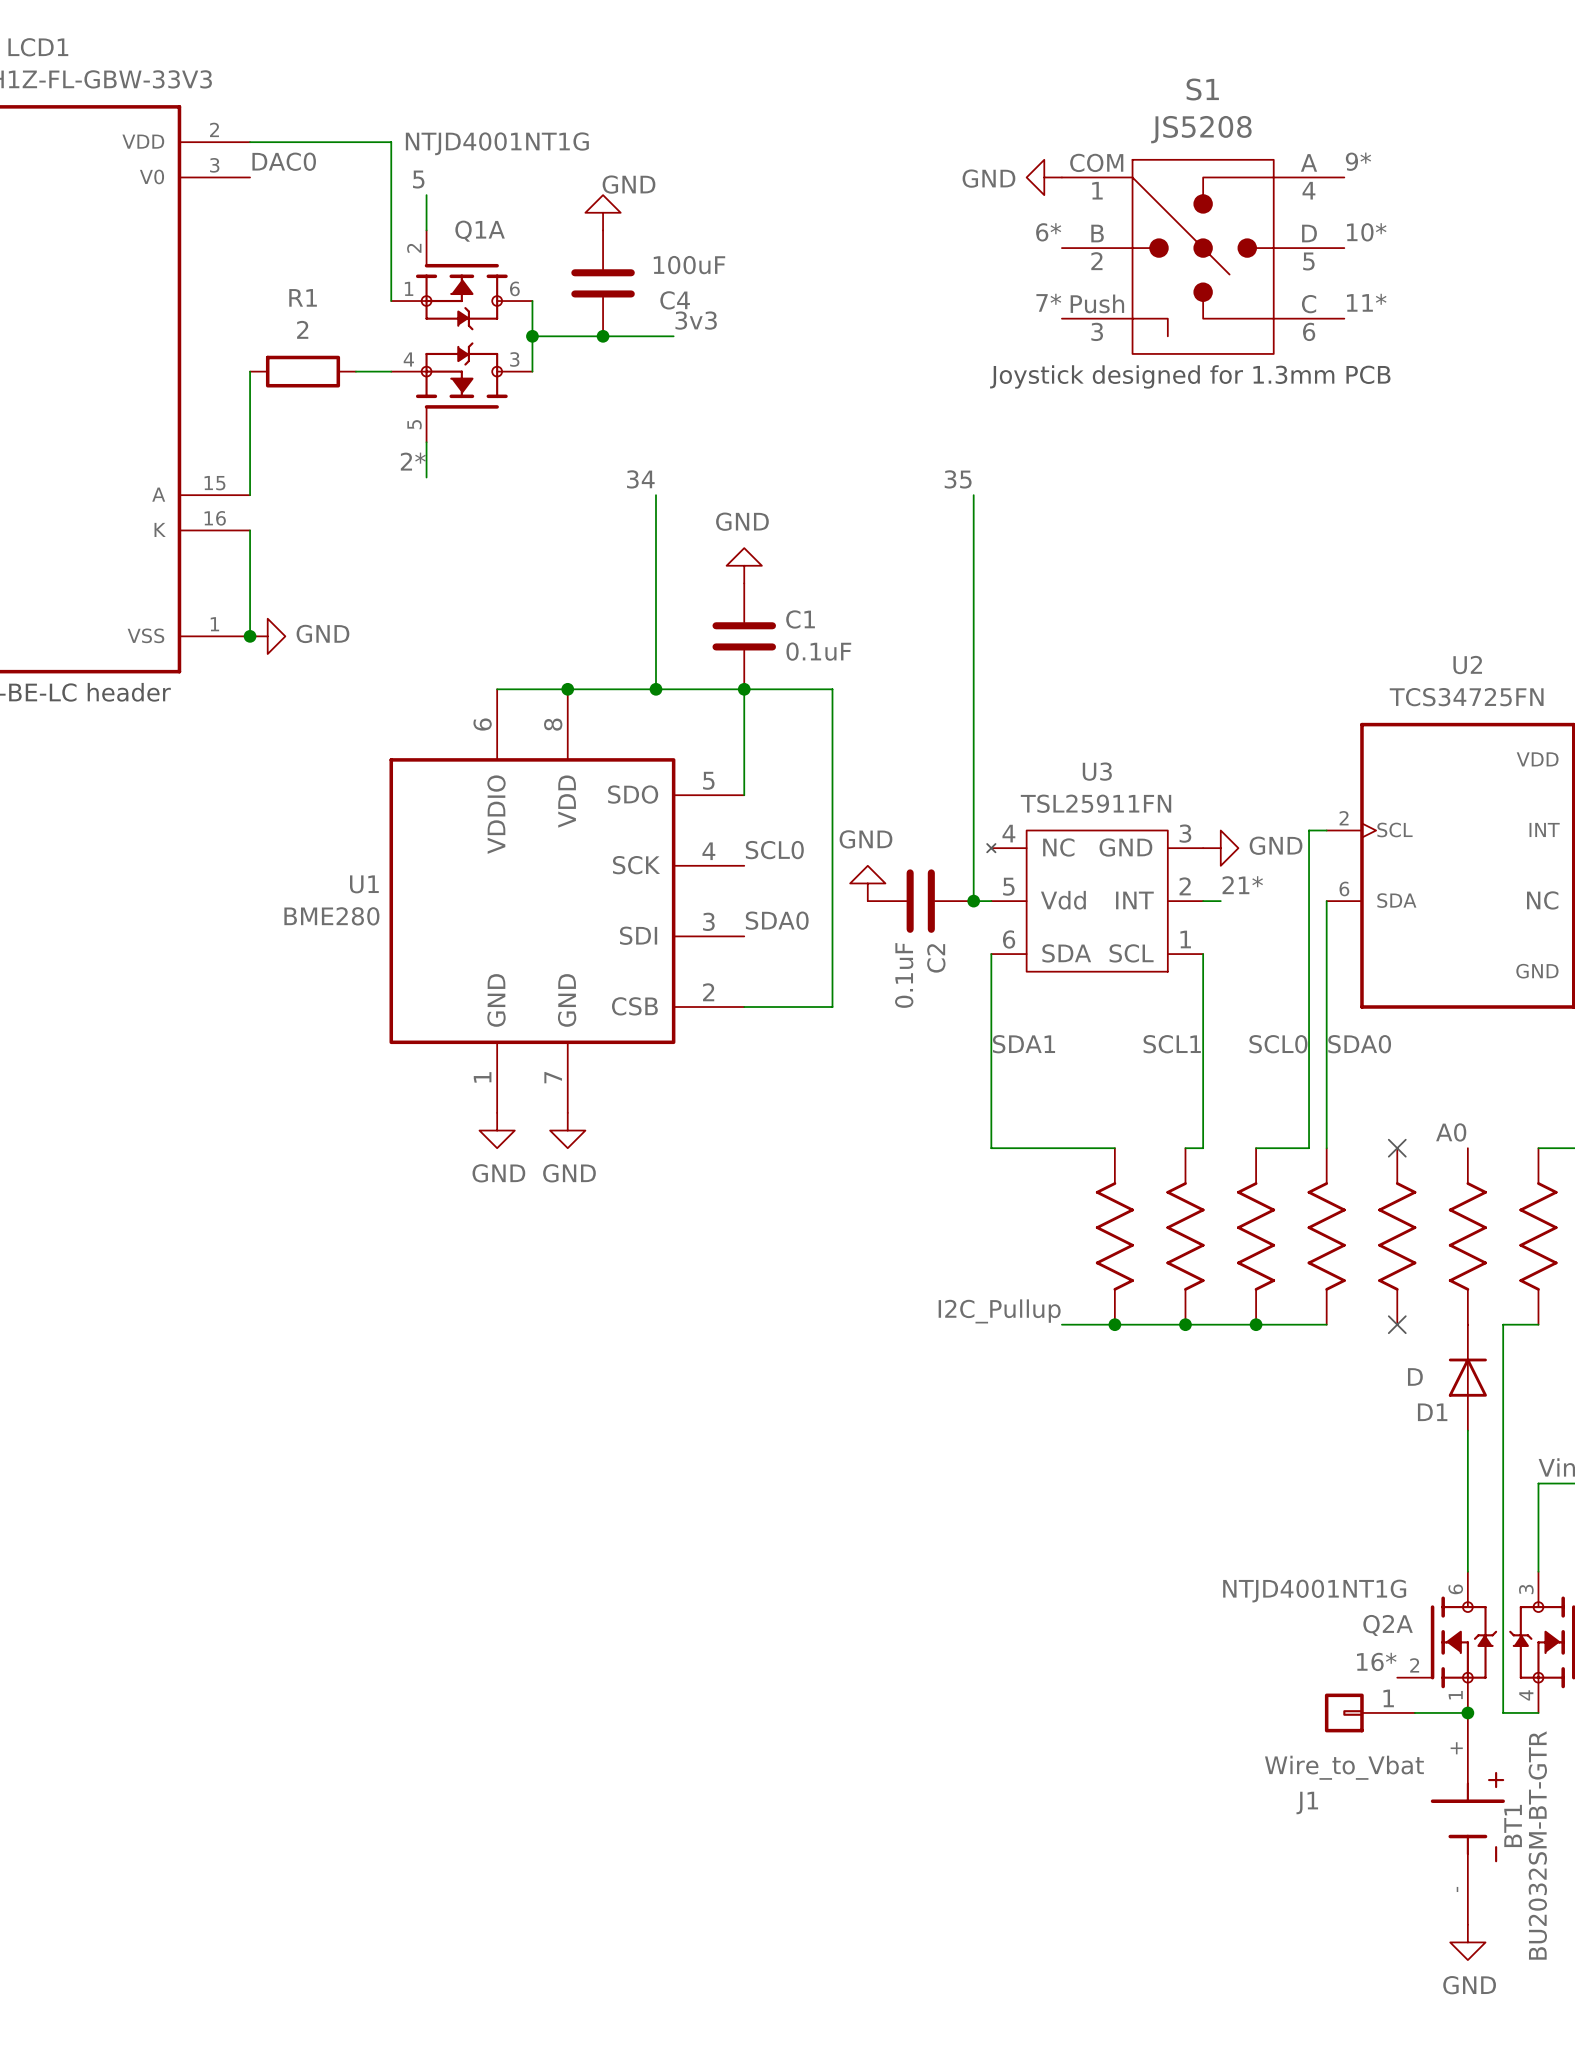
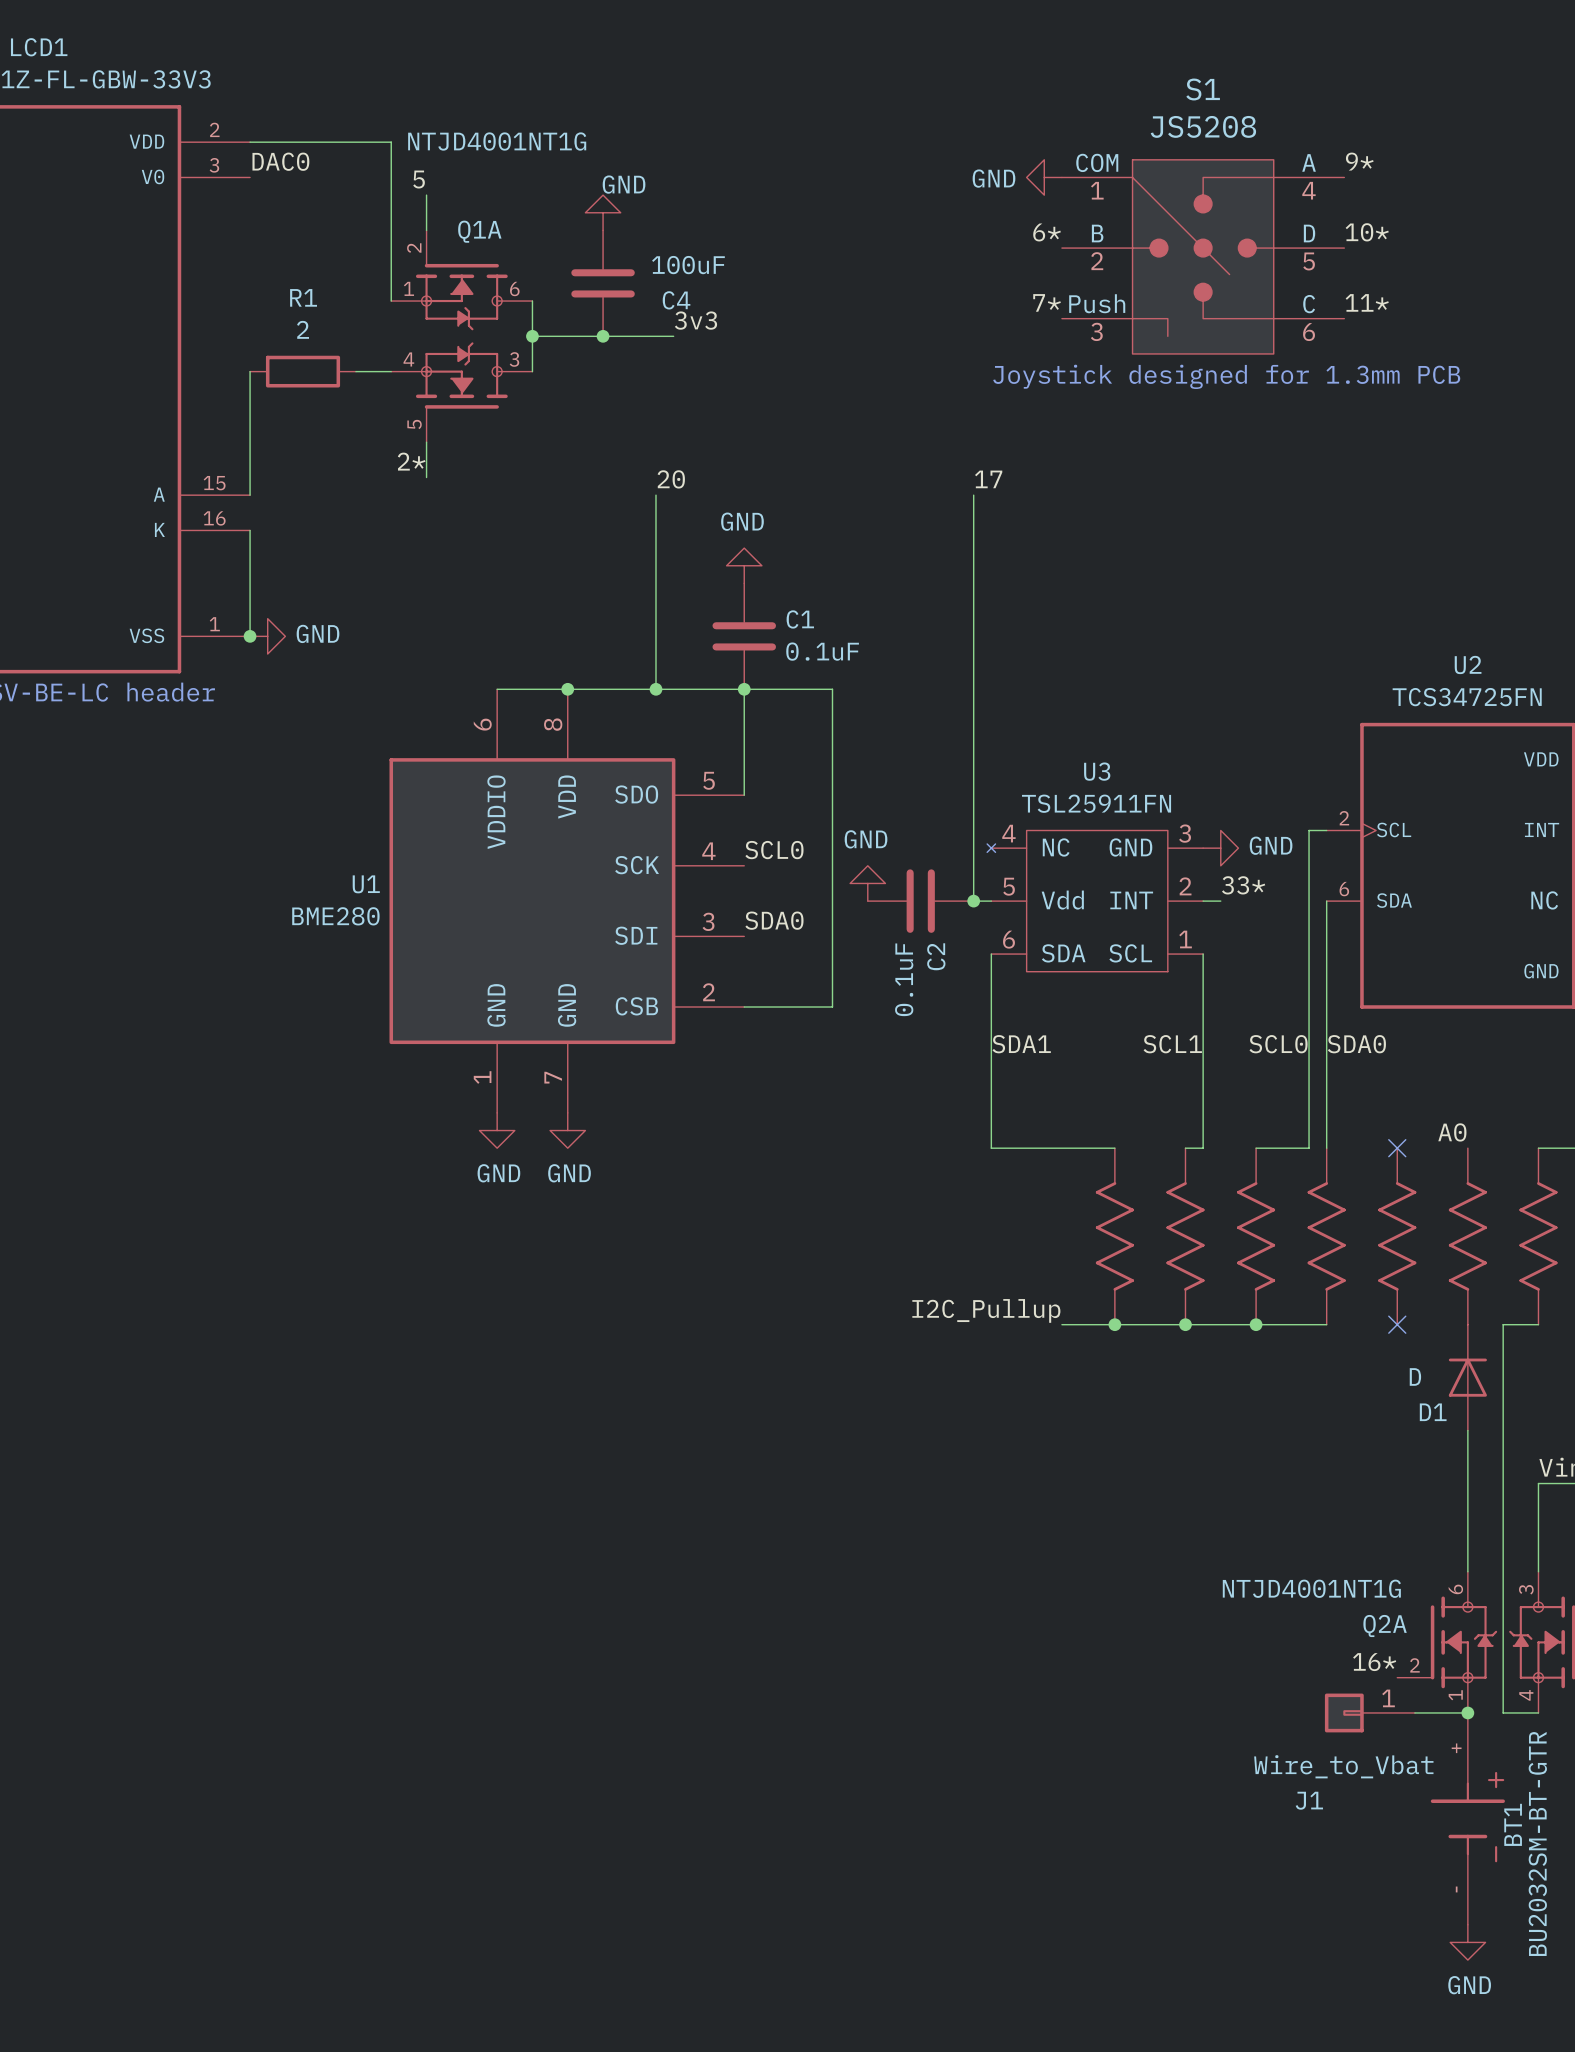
label: 34 (640, 479) -> 20 (671, 479)
label: 35 (958, 479) -> 17 (988, 479)
label: 21* (1242, 885) -> 33* (1243, 885)

